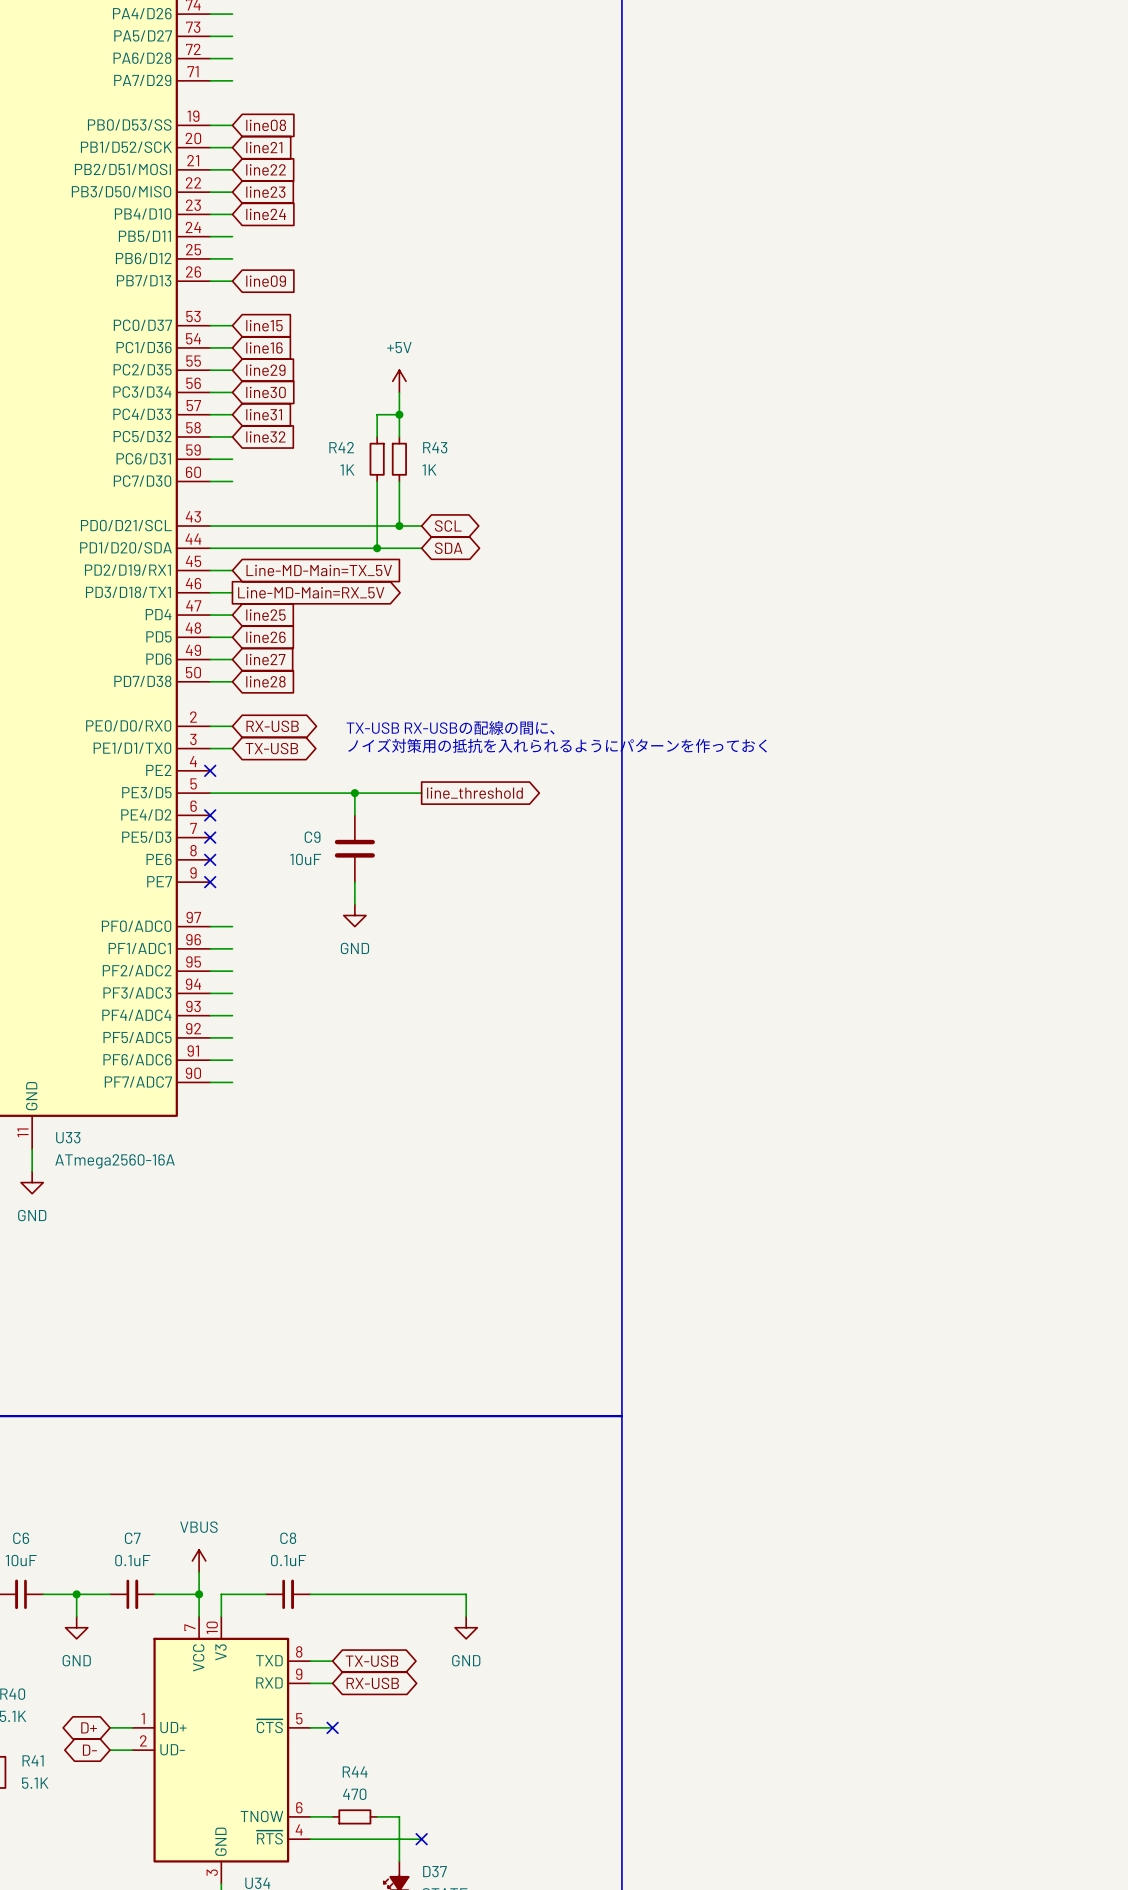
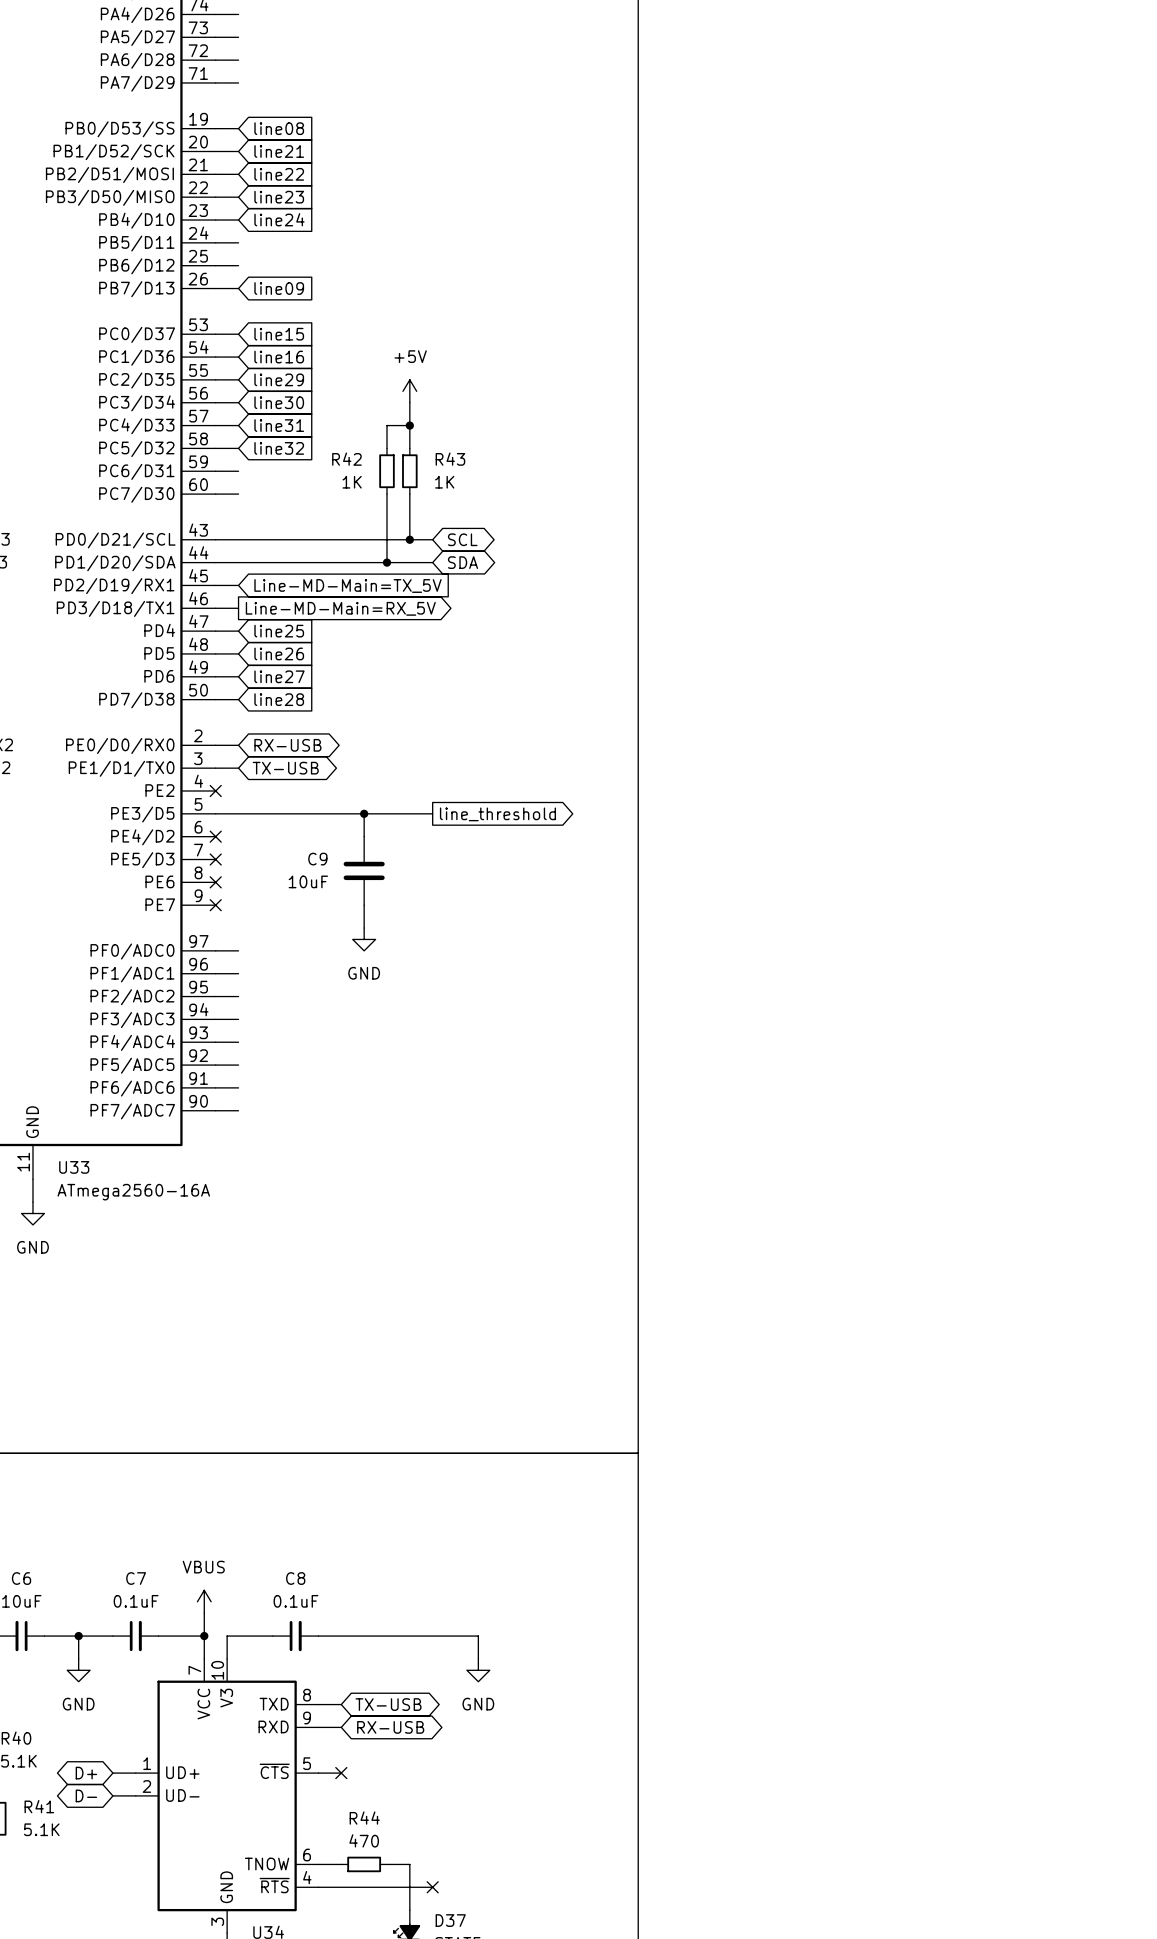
text: TX-USB RX-USBの配線の間に、 (450, 727) -> none
text: ノイズ対策用の抵抗を入れられるようにパターンを作っておく (557, 745) -> none

